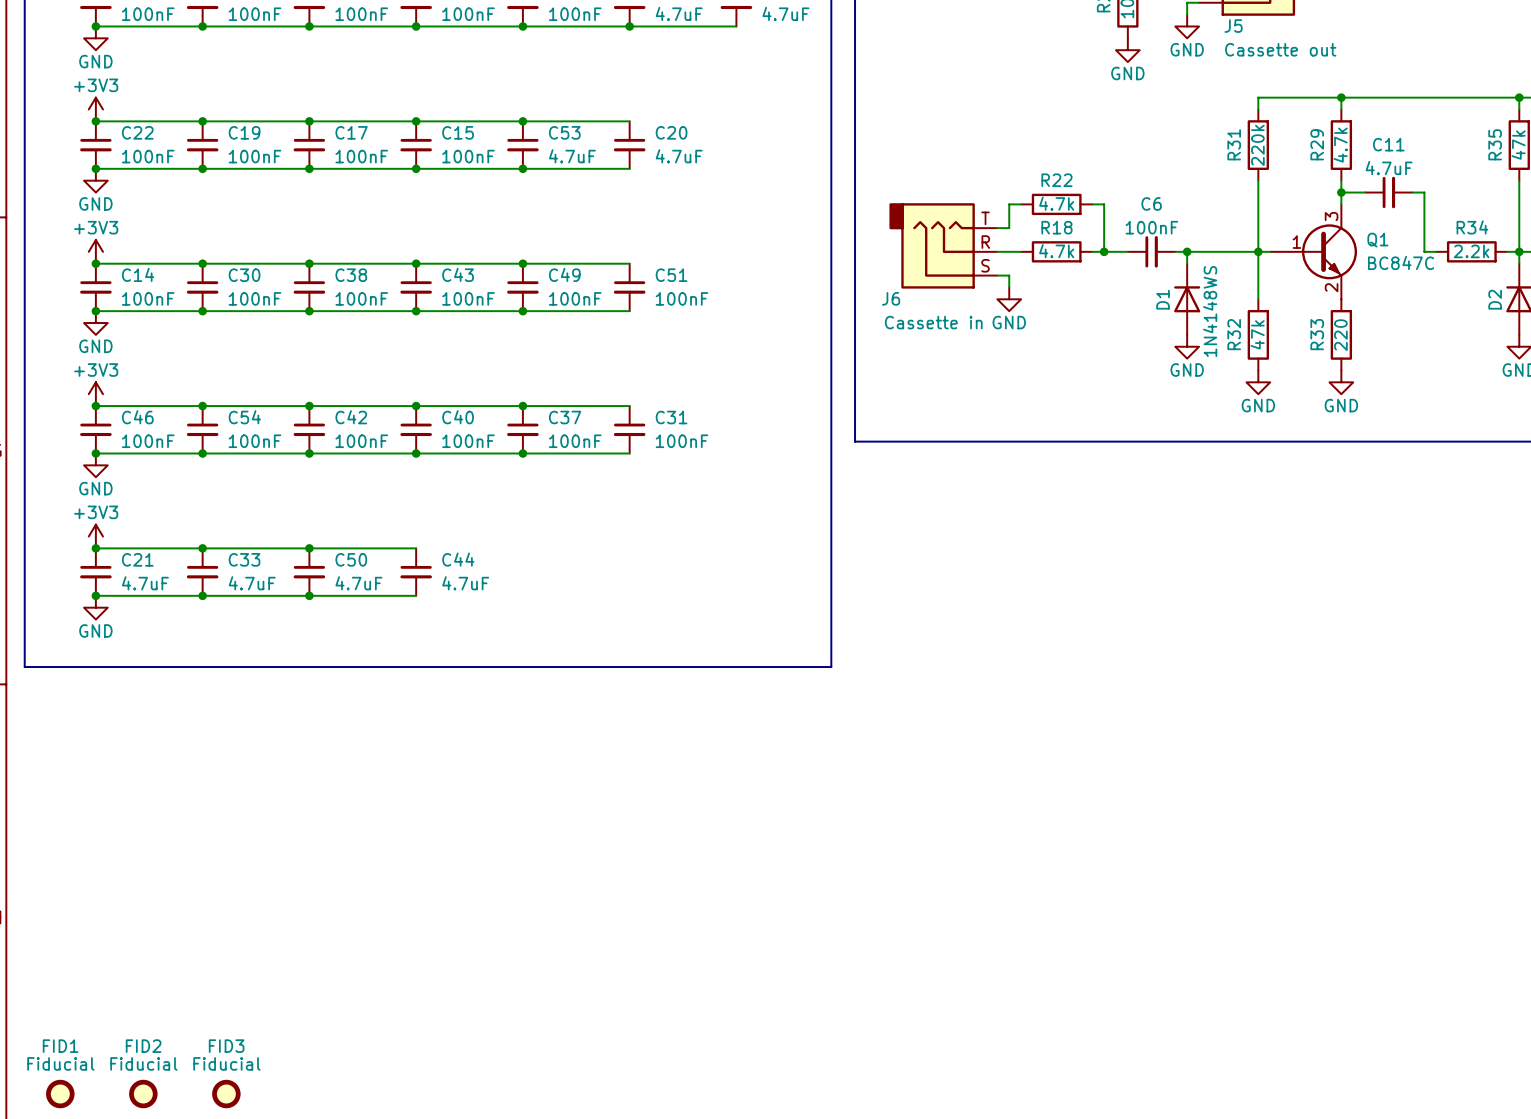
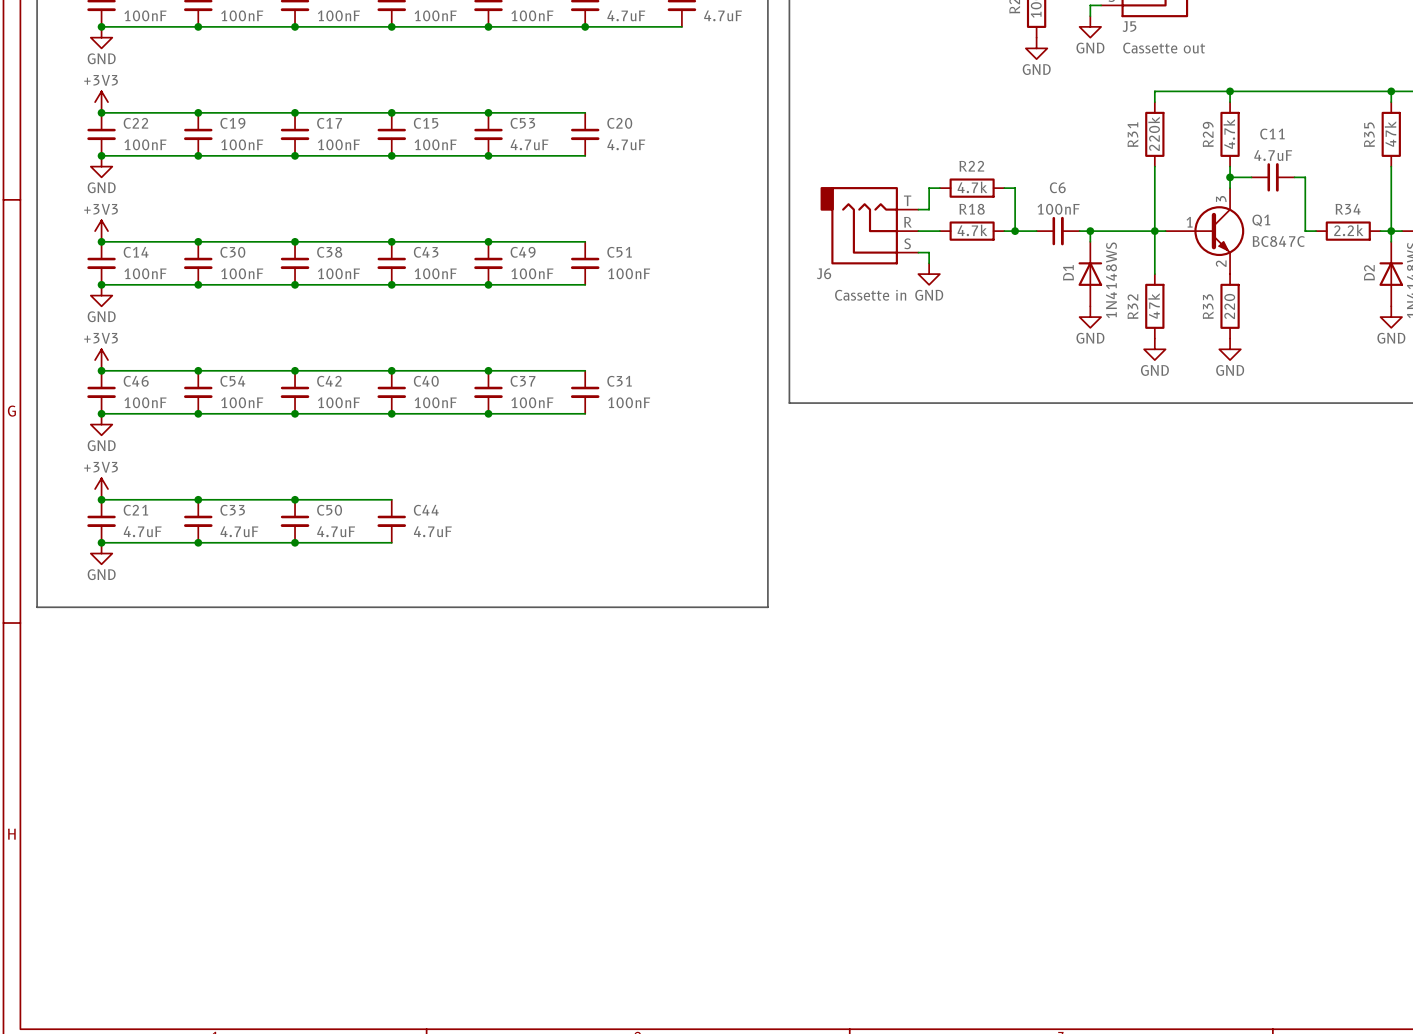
FID1: Fiducial (60, 1094) -> none
FID2: Fiducial (143, 1094) -> none
FID3: Fiducial (226, 1094) -> none

